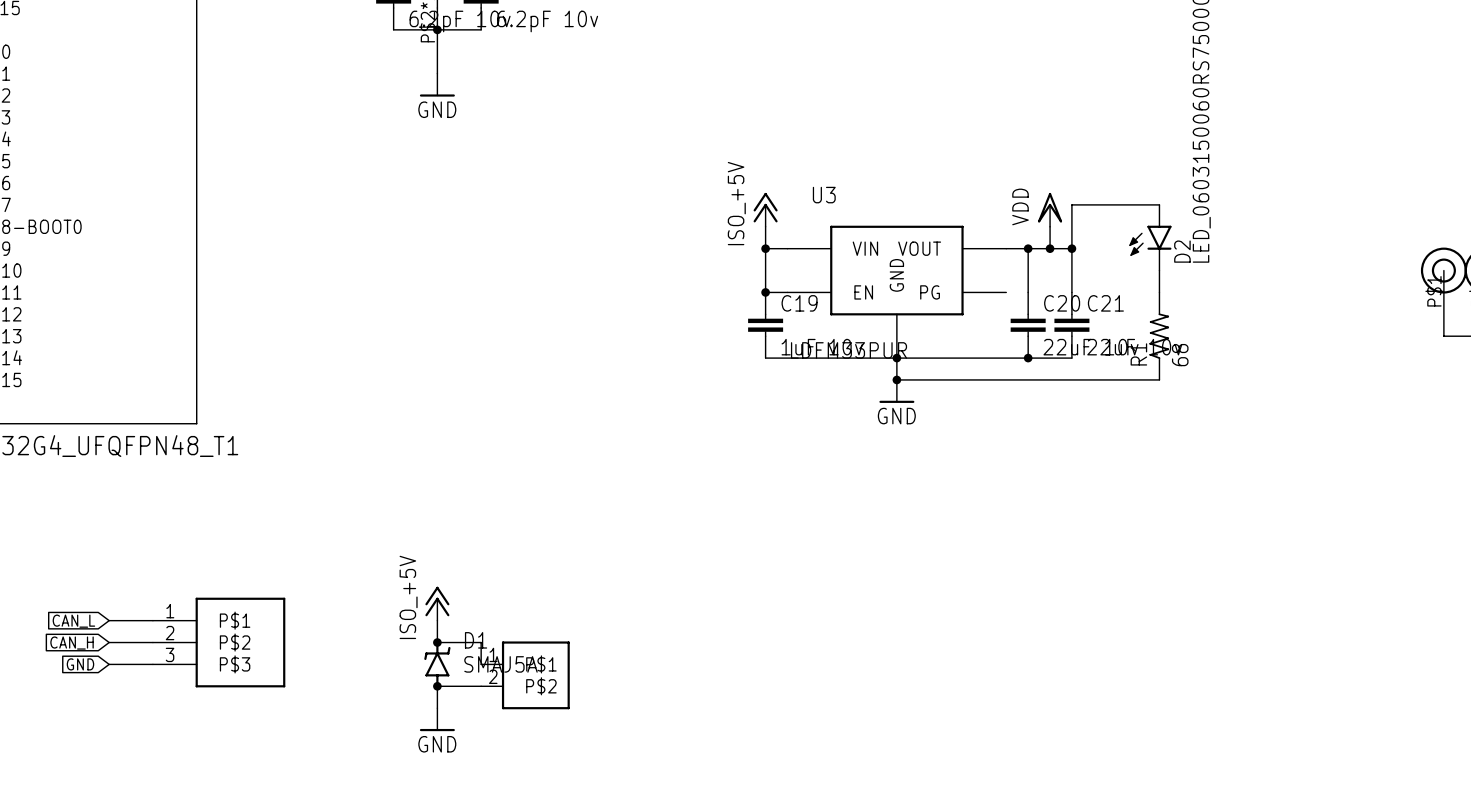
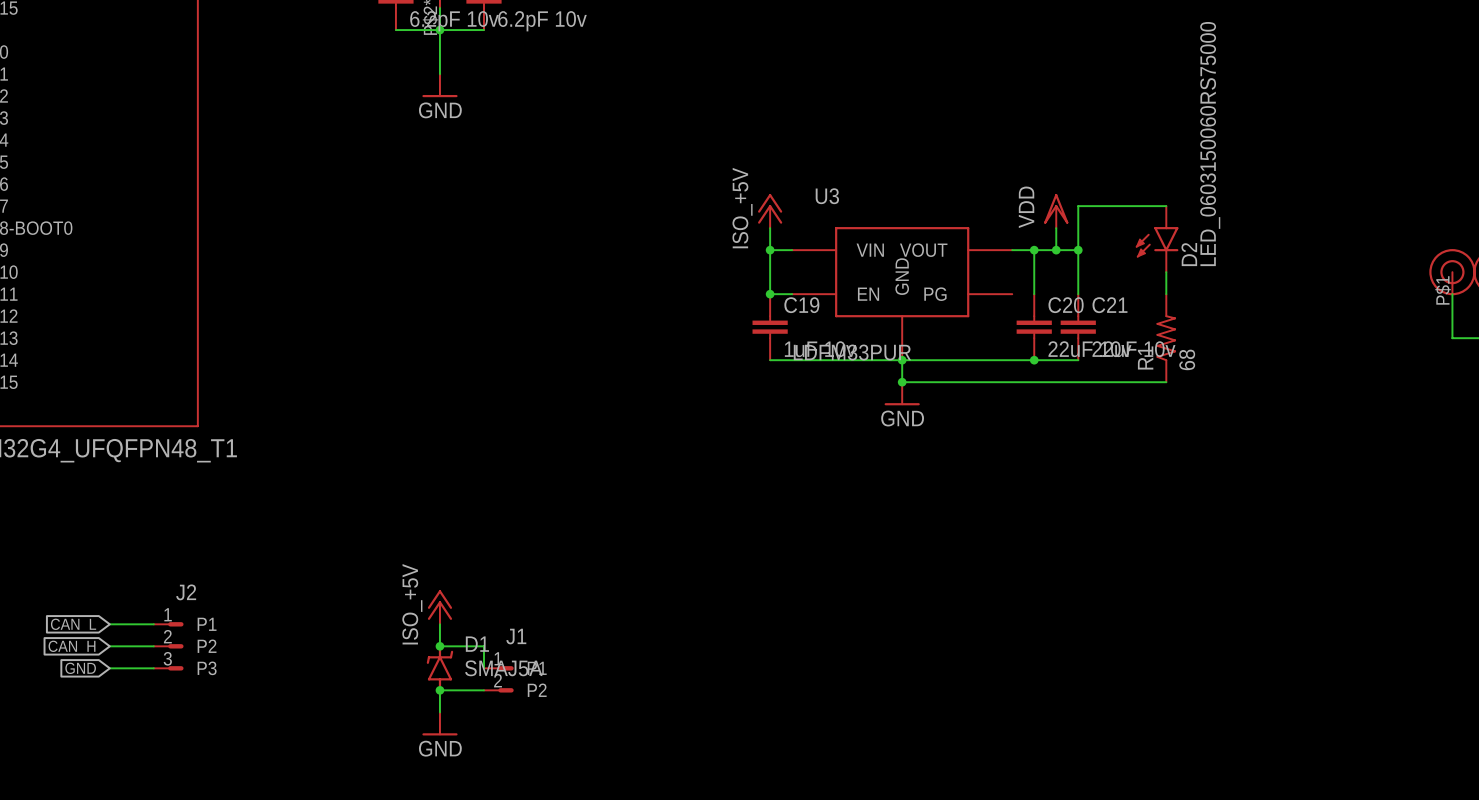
J2: none -> (168, 646)
part: (219, 642) -> none
J1: none -> (498, 679)
part: (525, 675) -> none

